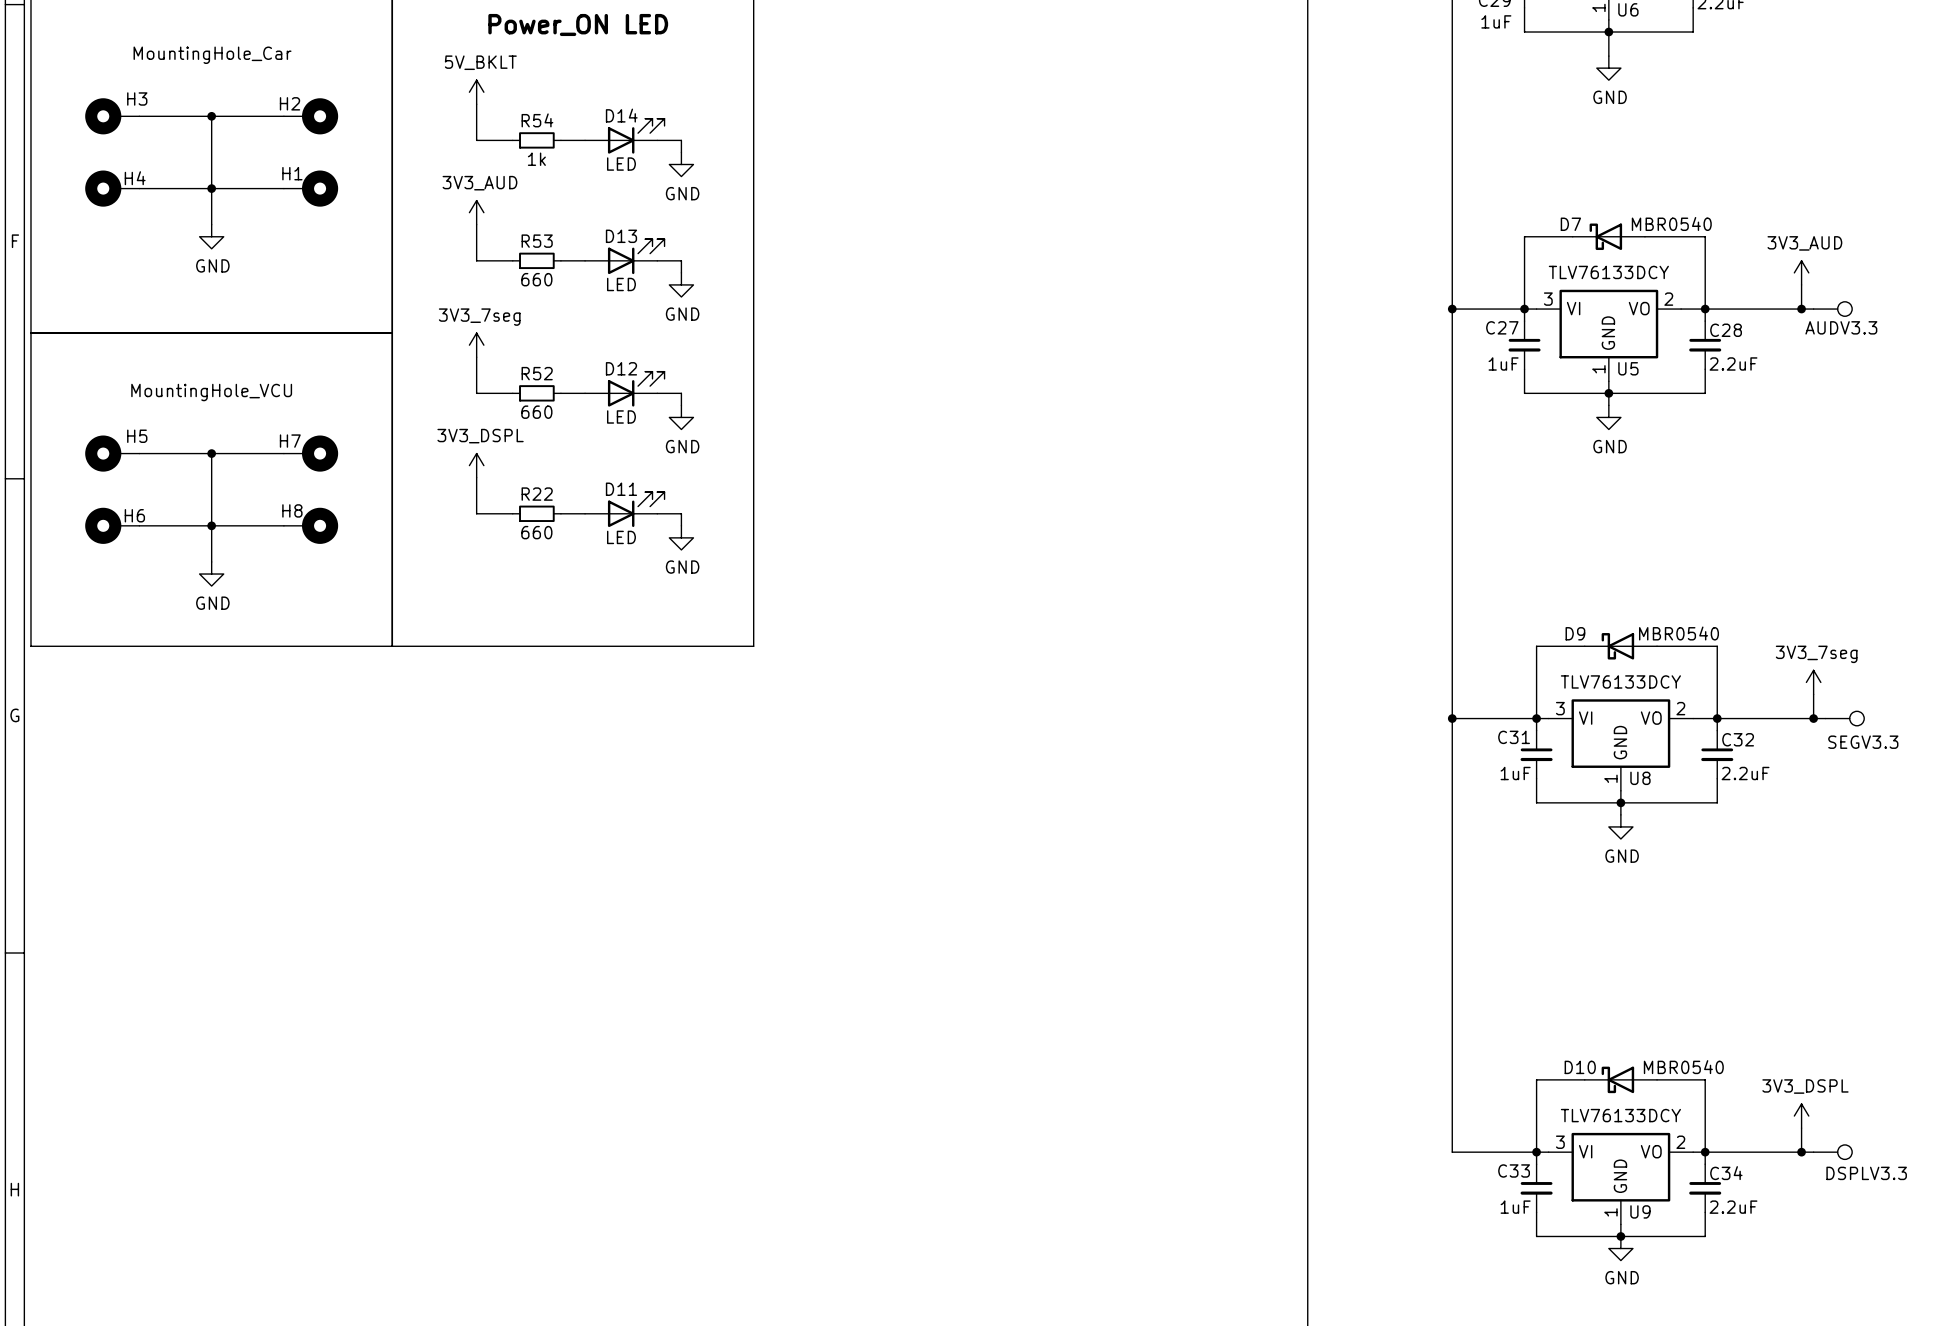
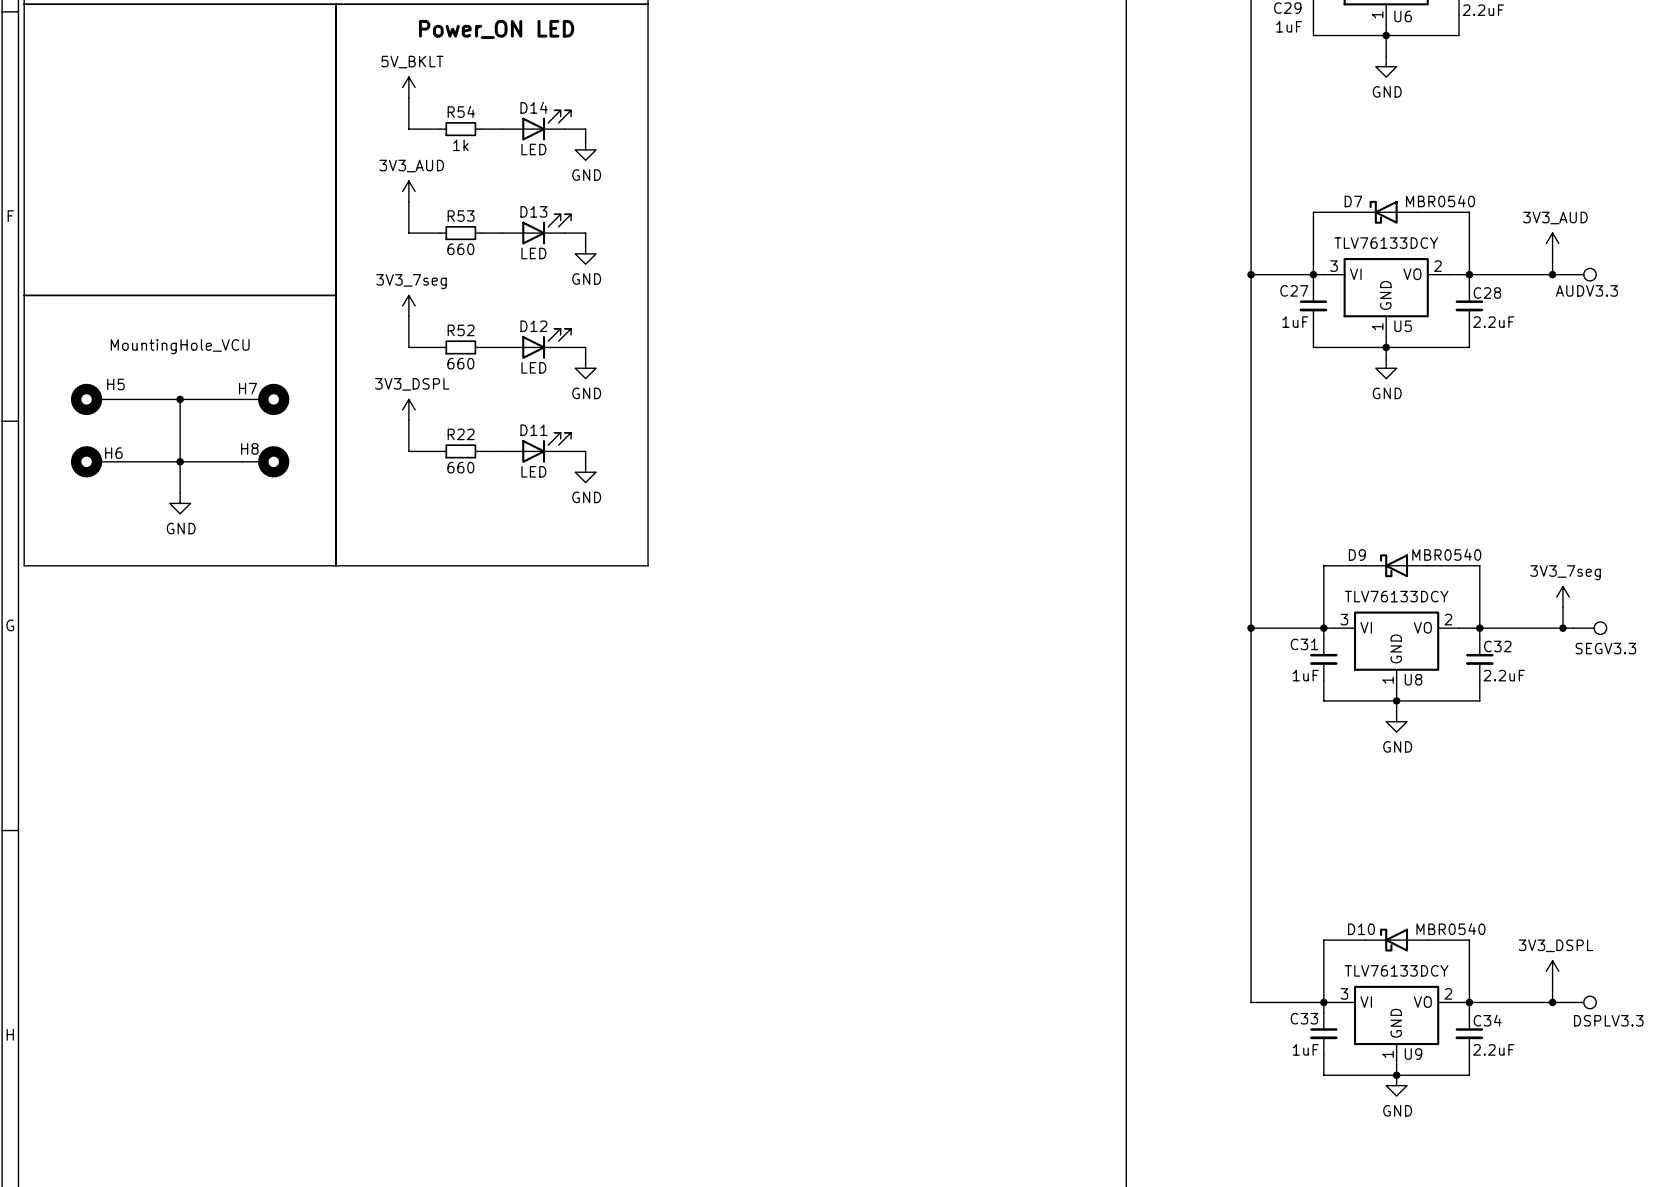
H3: MountingHole_Car (112, 116) -> none
wire: (139, 116) (283, 116) -> none
wire: (211, 116) (211, 224) -> none
junction: (211, 116) -> none
H2: (311, 116) -> none
H4: (112, 188) -> none
wire: (139, 188) (283, 188) -> none
junction: (211, 188) -> none
H1: (311, 188) -> none
power symbol: GND (211, 236) -> none

